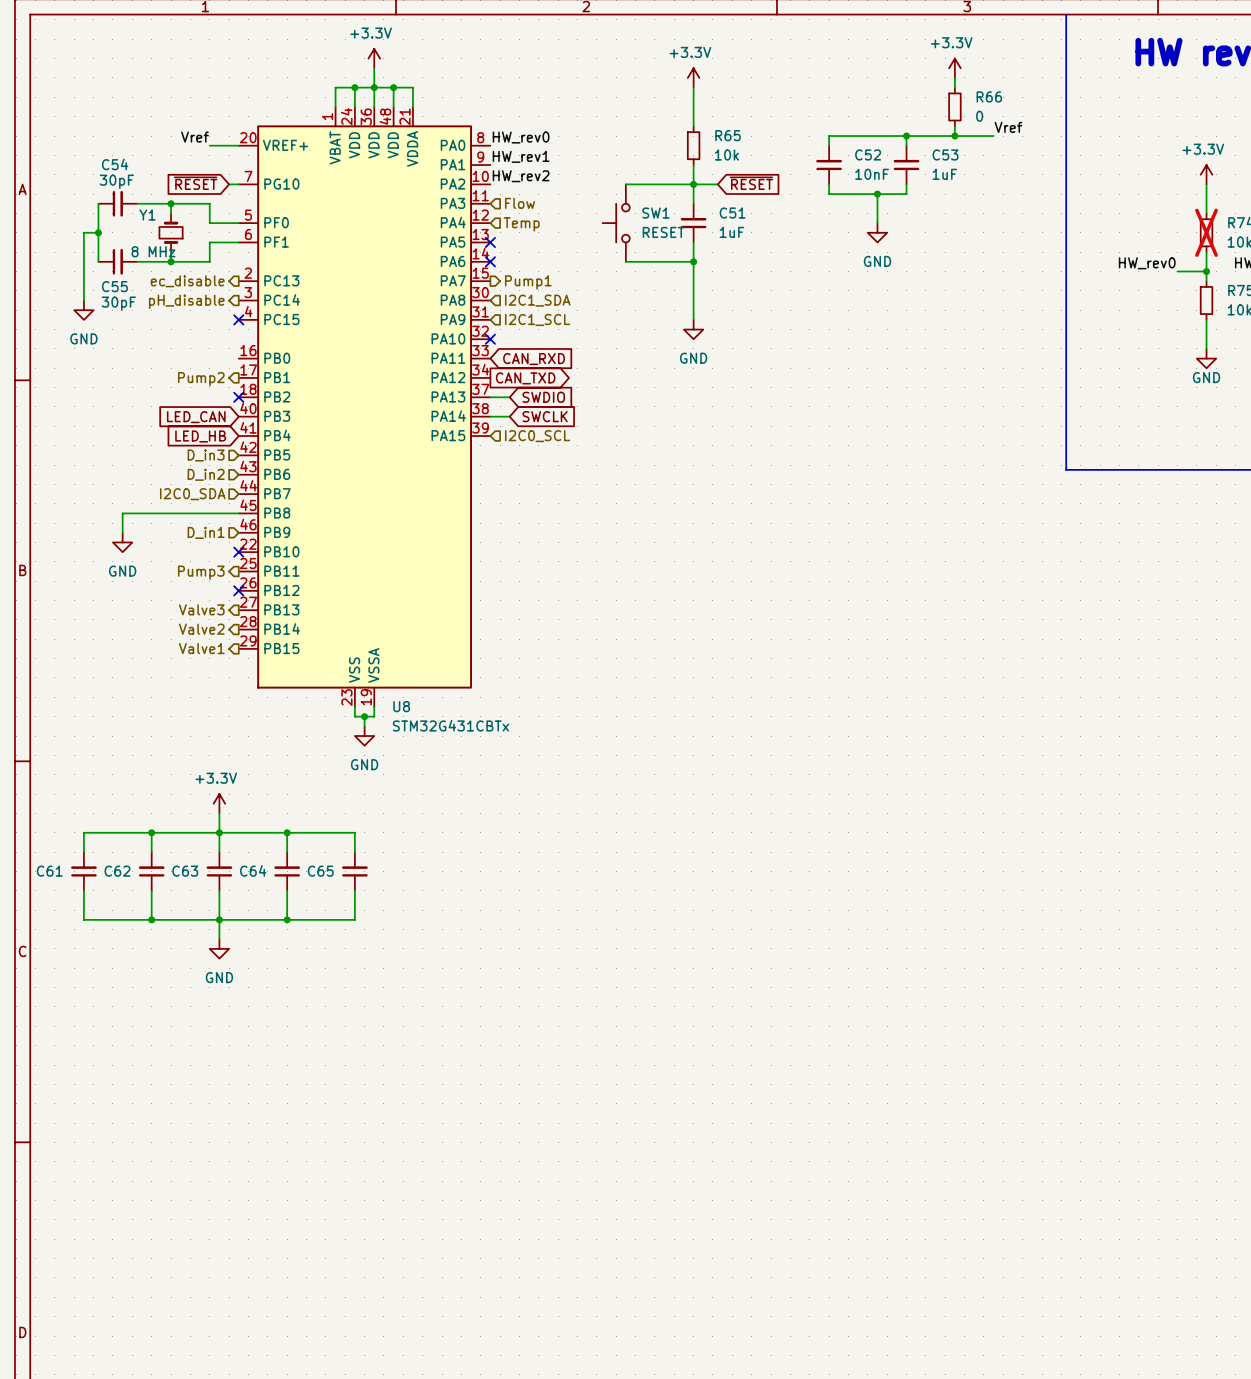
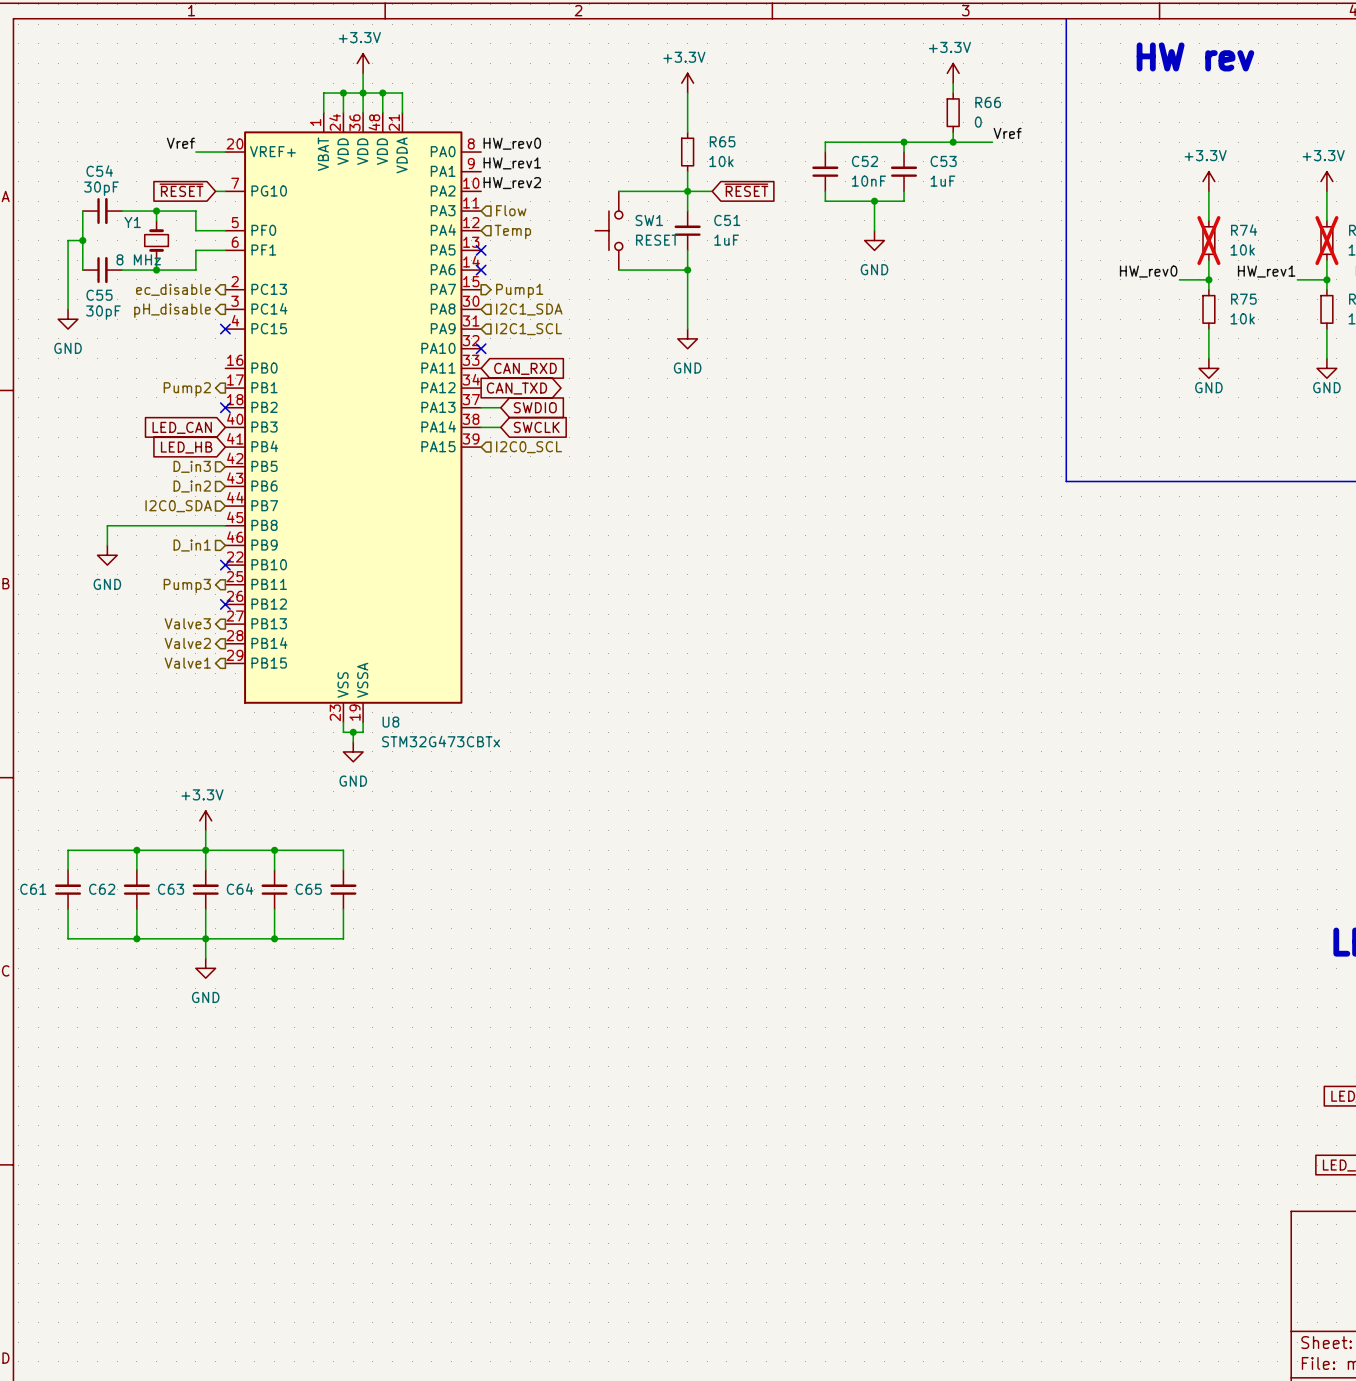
U8 value: STM32G431CBTx (450, 725) -> STM32G473CBTx (441, 741)

